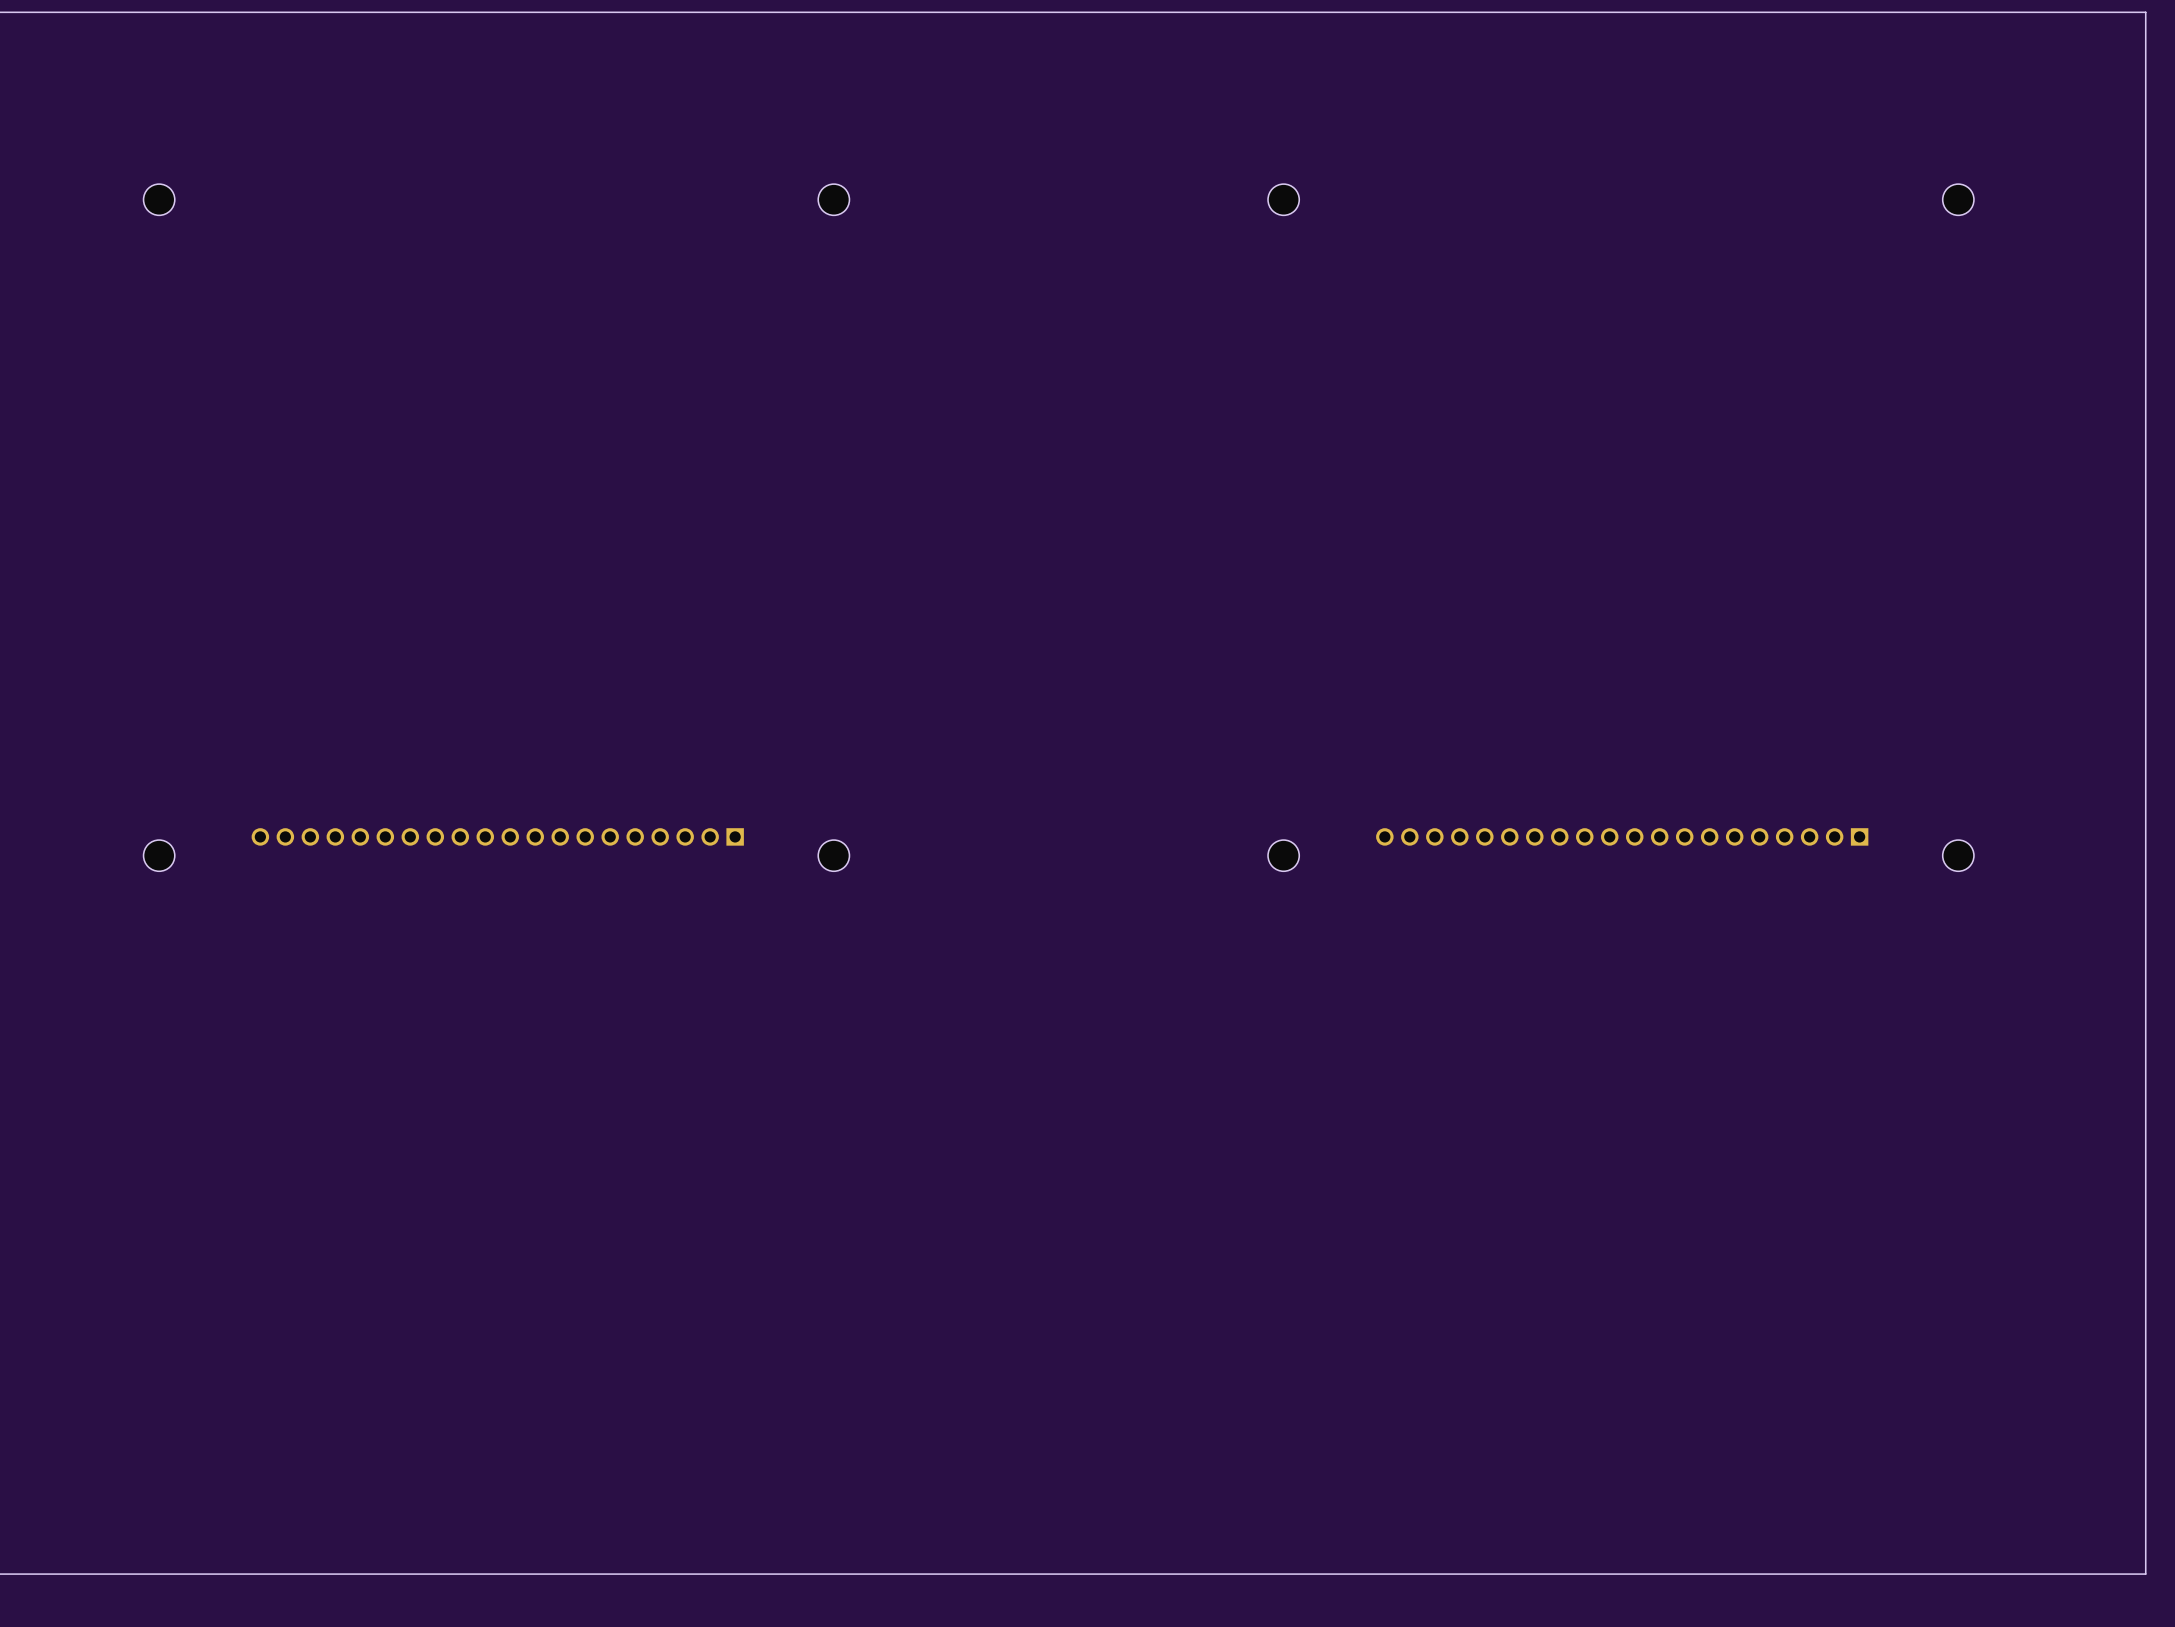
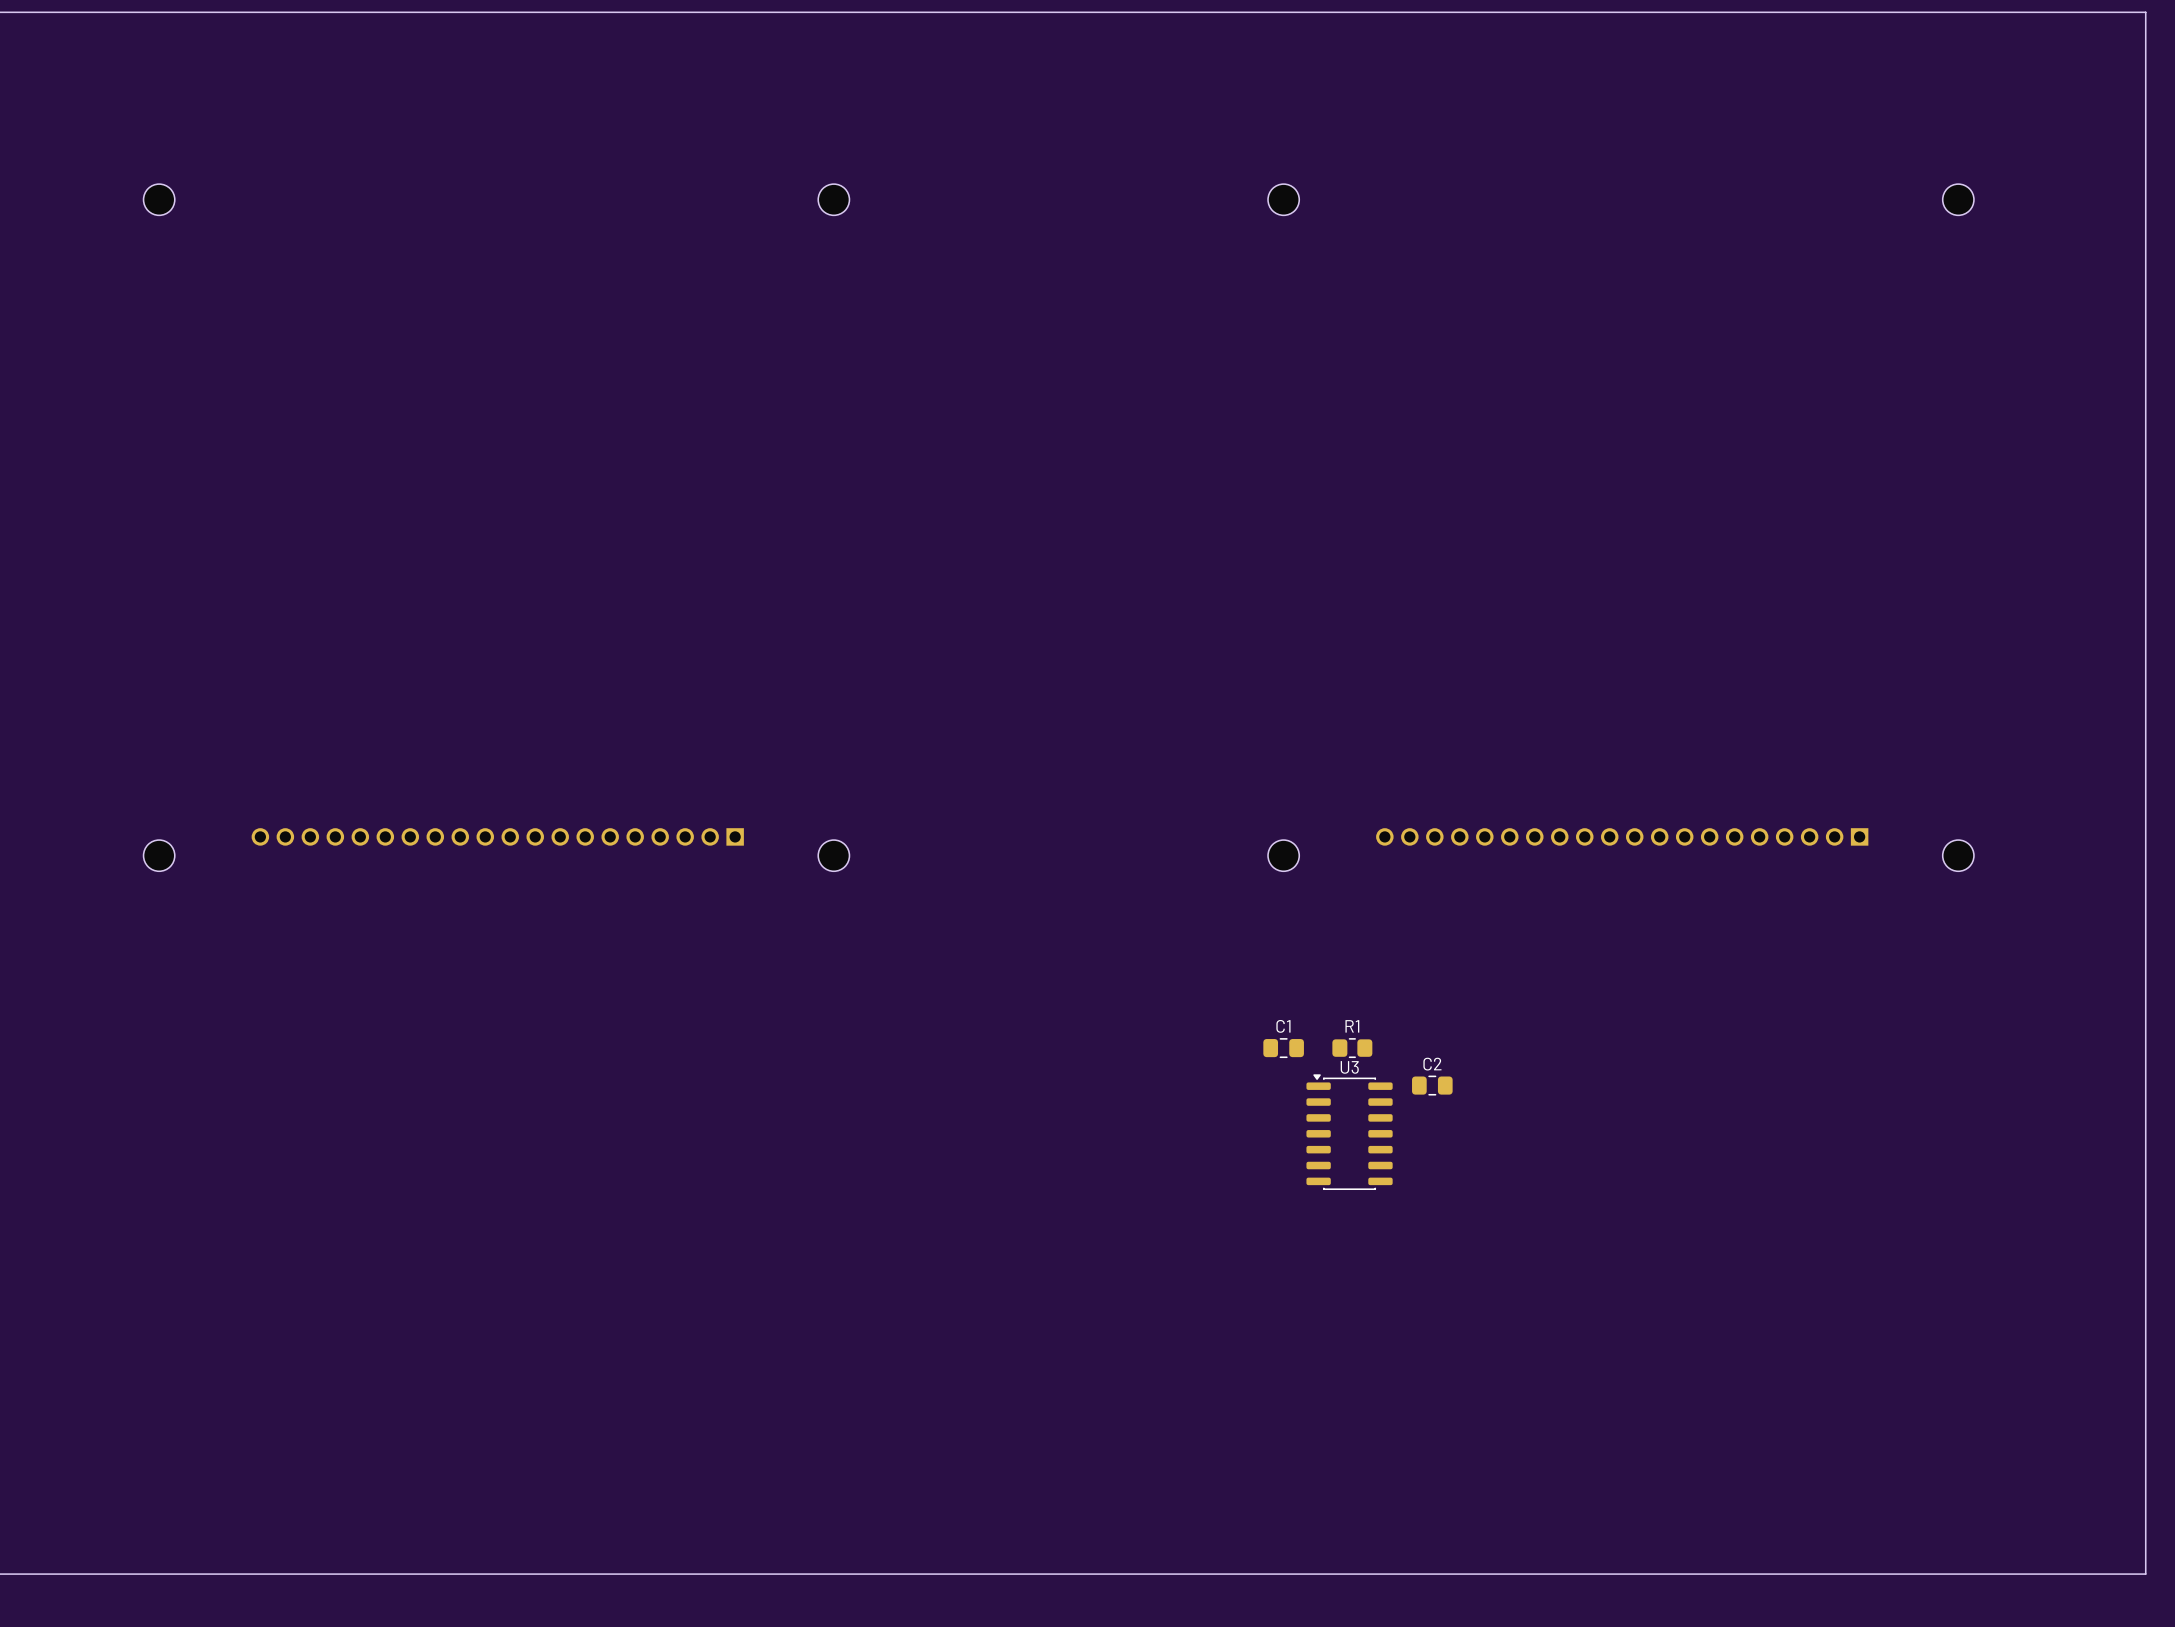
C1: none -> (1283, 1048)
R1: none -> (1352, 1048)
C2: none -> (1432, 1085)
U3: none -> (1349, 1132)

